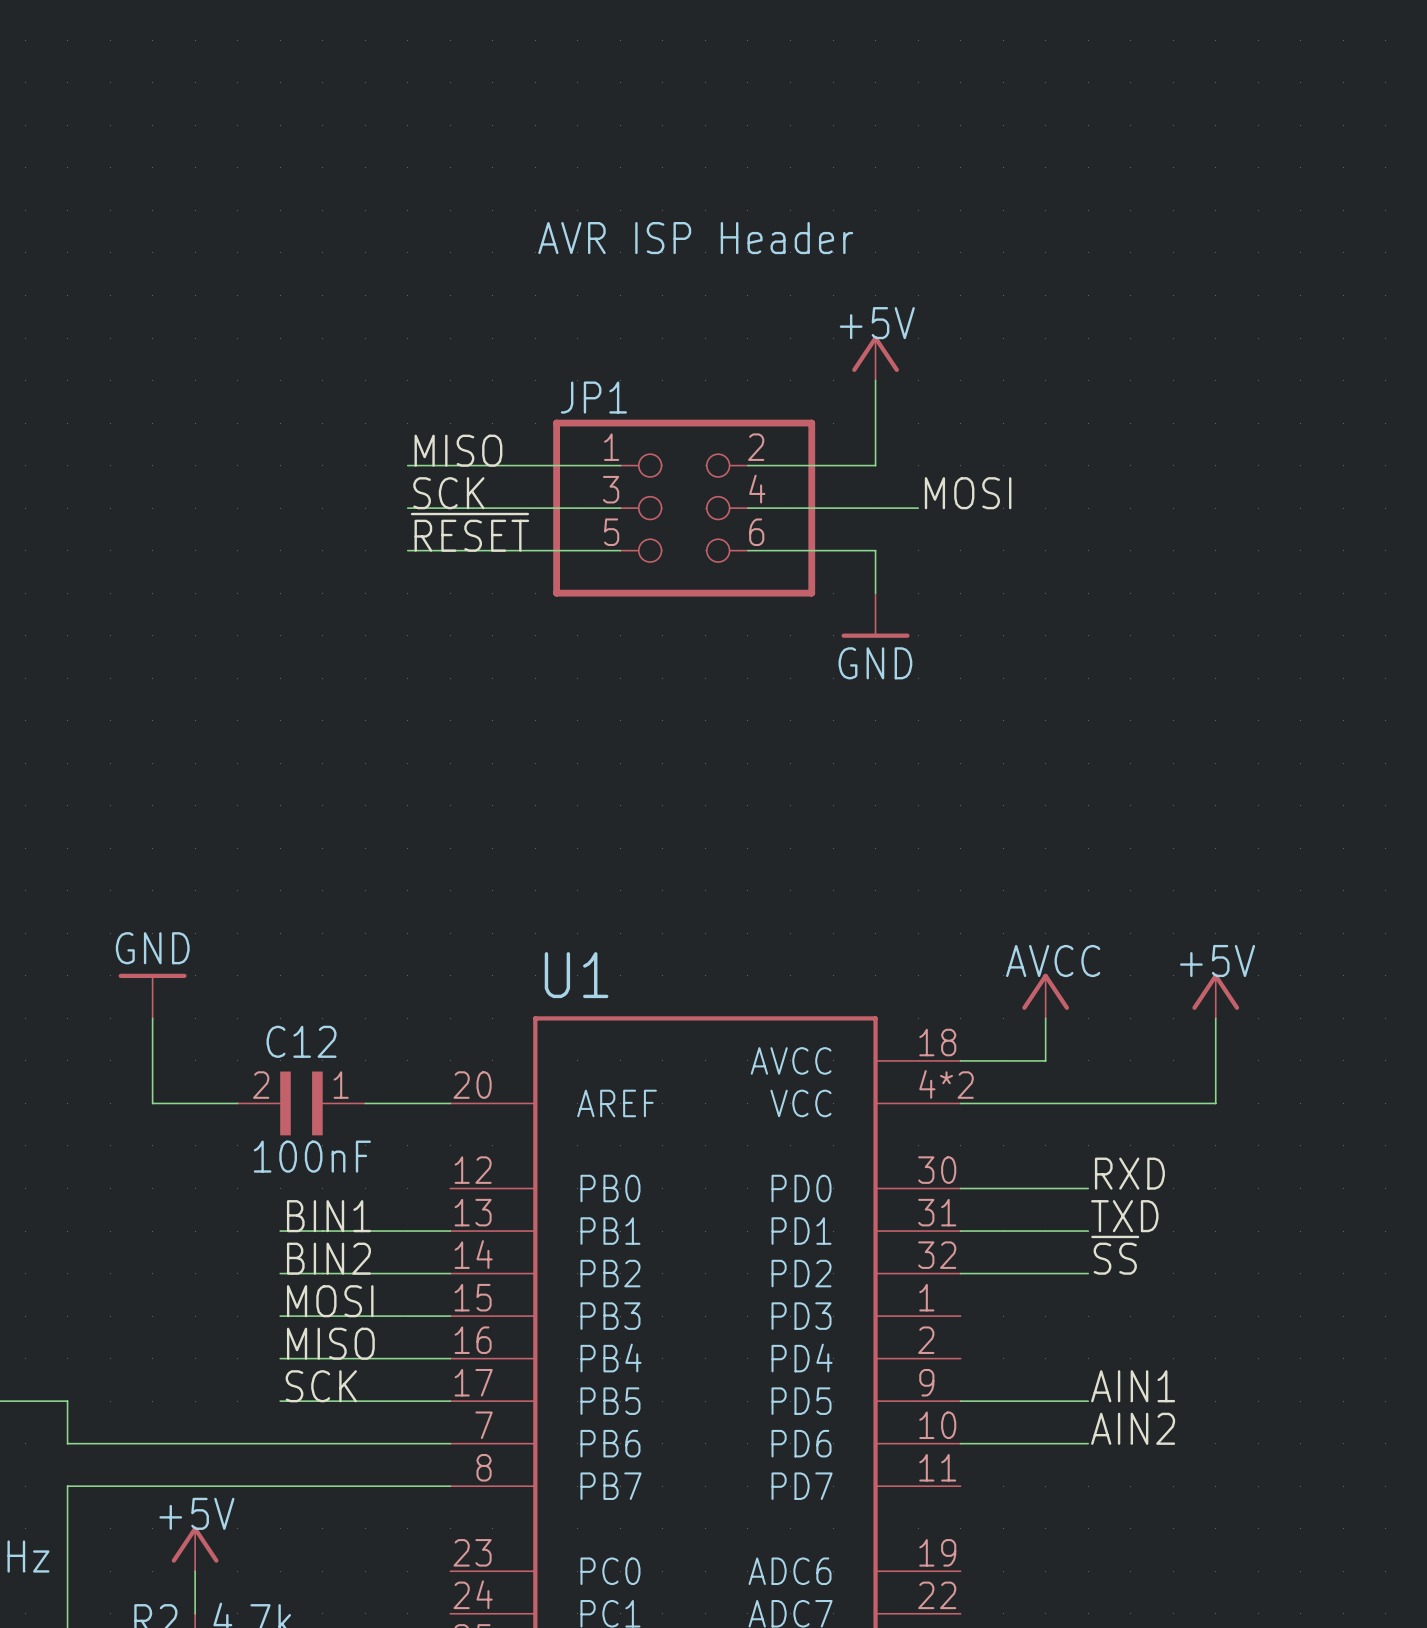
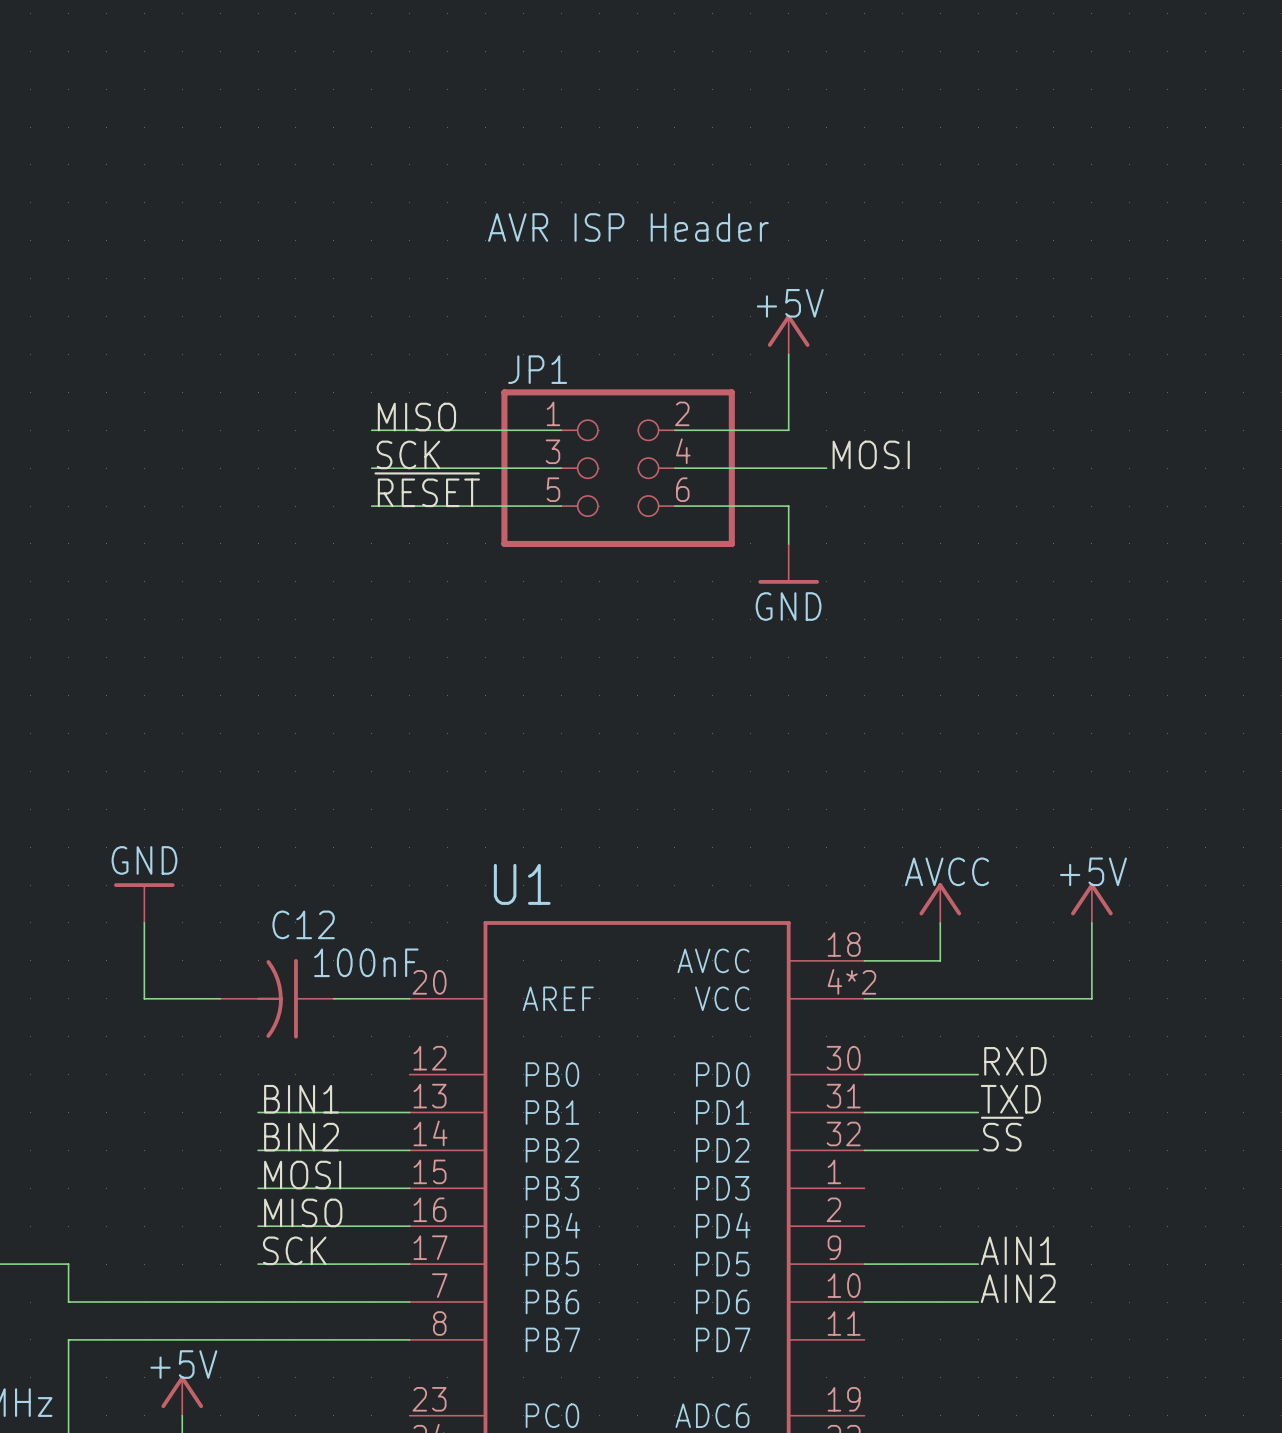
C12 name position: C12 (301, 1041) -> C12 (303, 924)
C12 symbol: [237, 1071, 366, 1136] -> [220, 959, 334, 1039]
C12 value position: 100nF (312, 1156) -> 100nF (366, 962)

